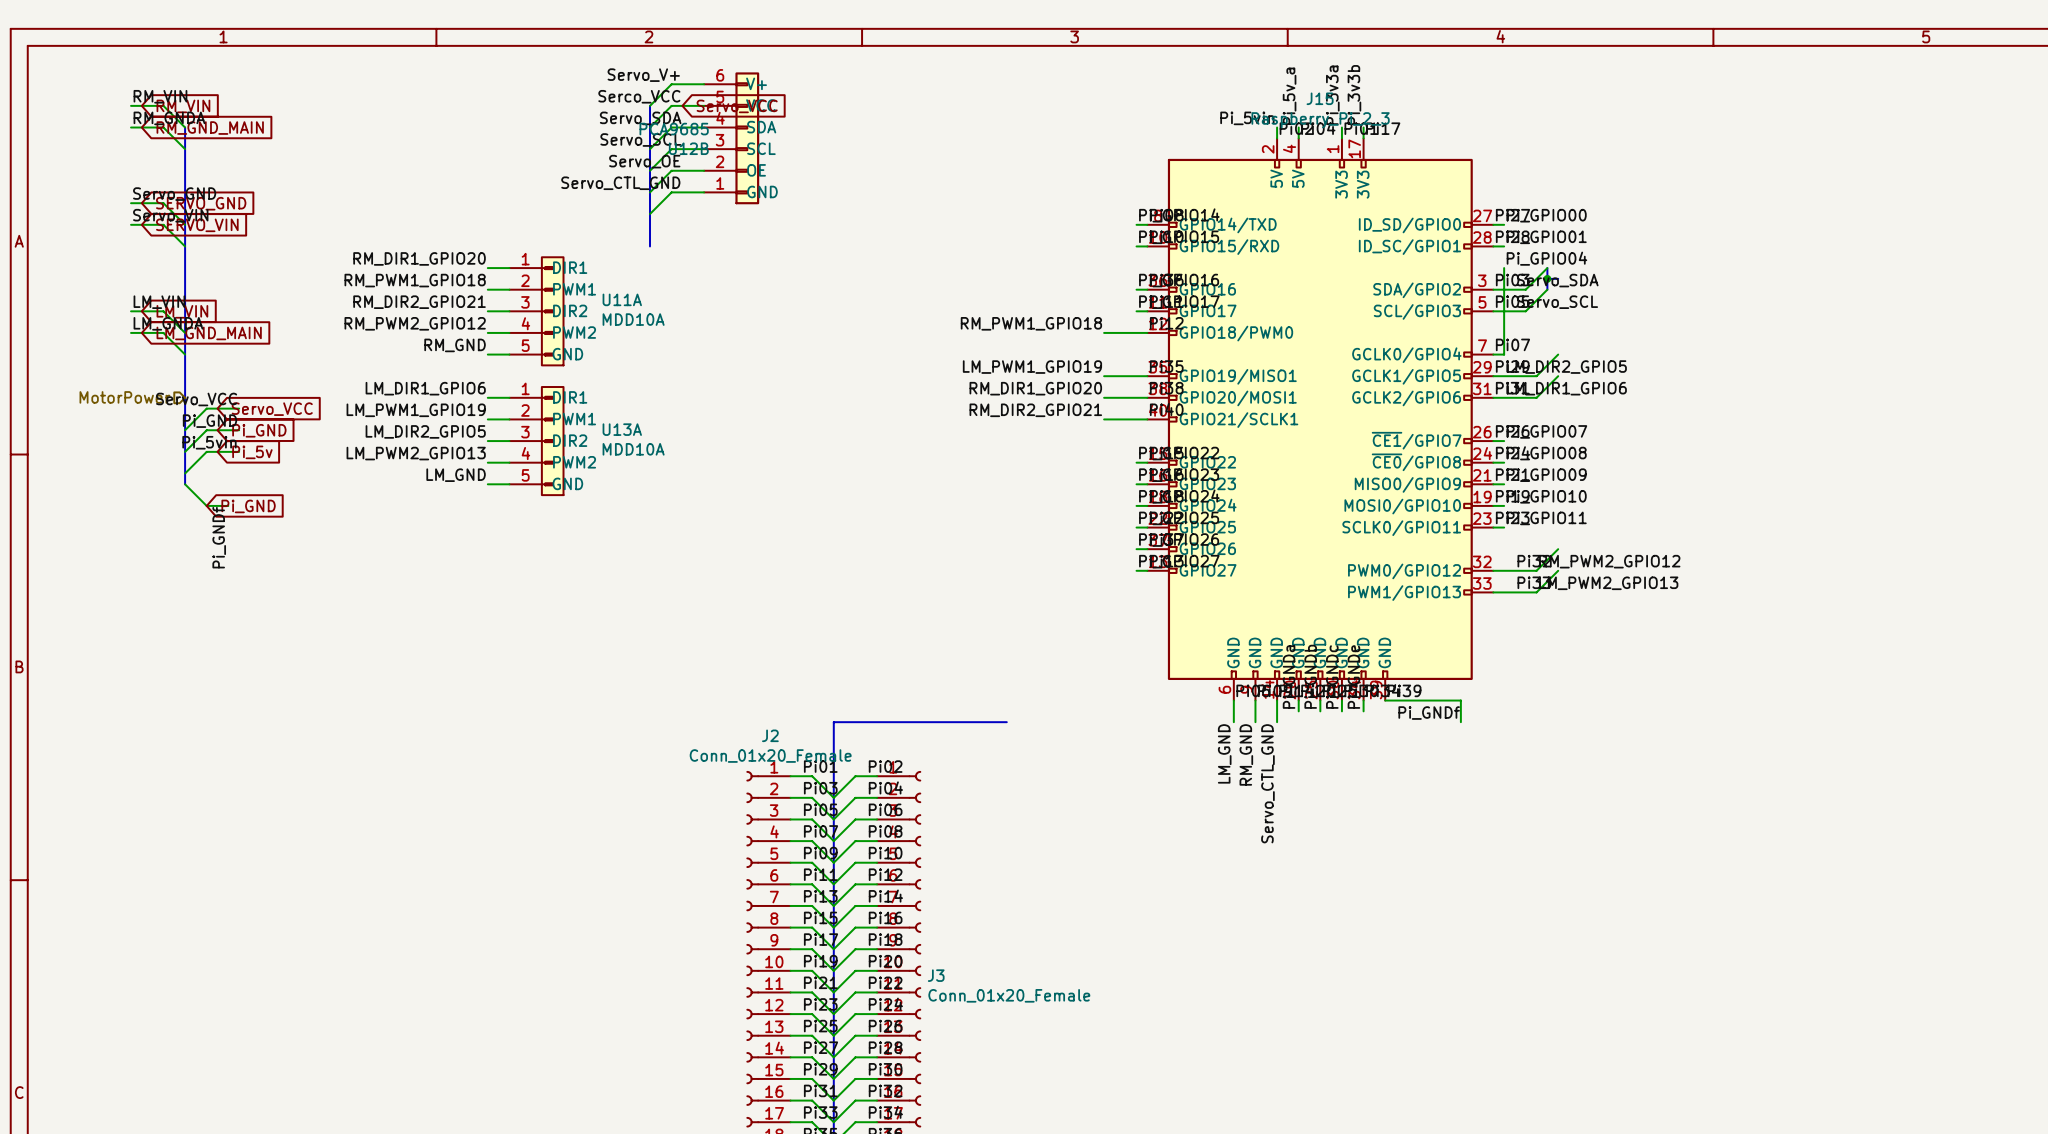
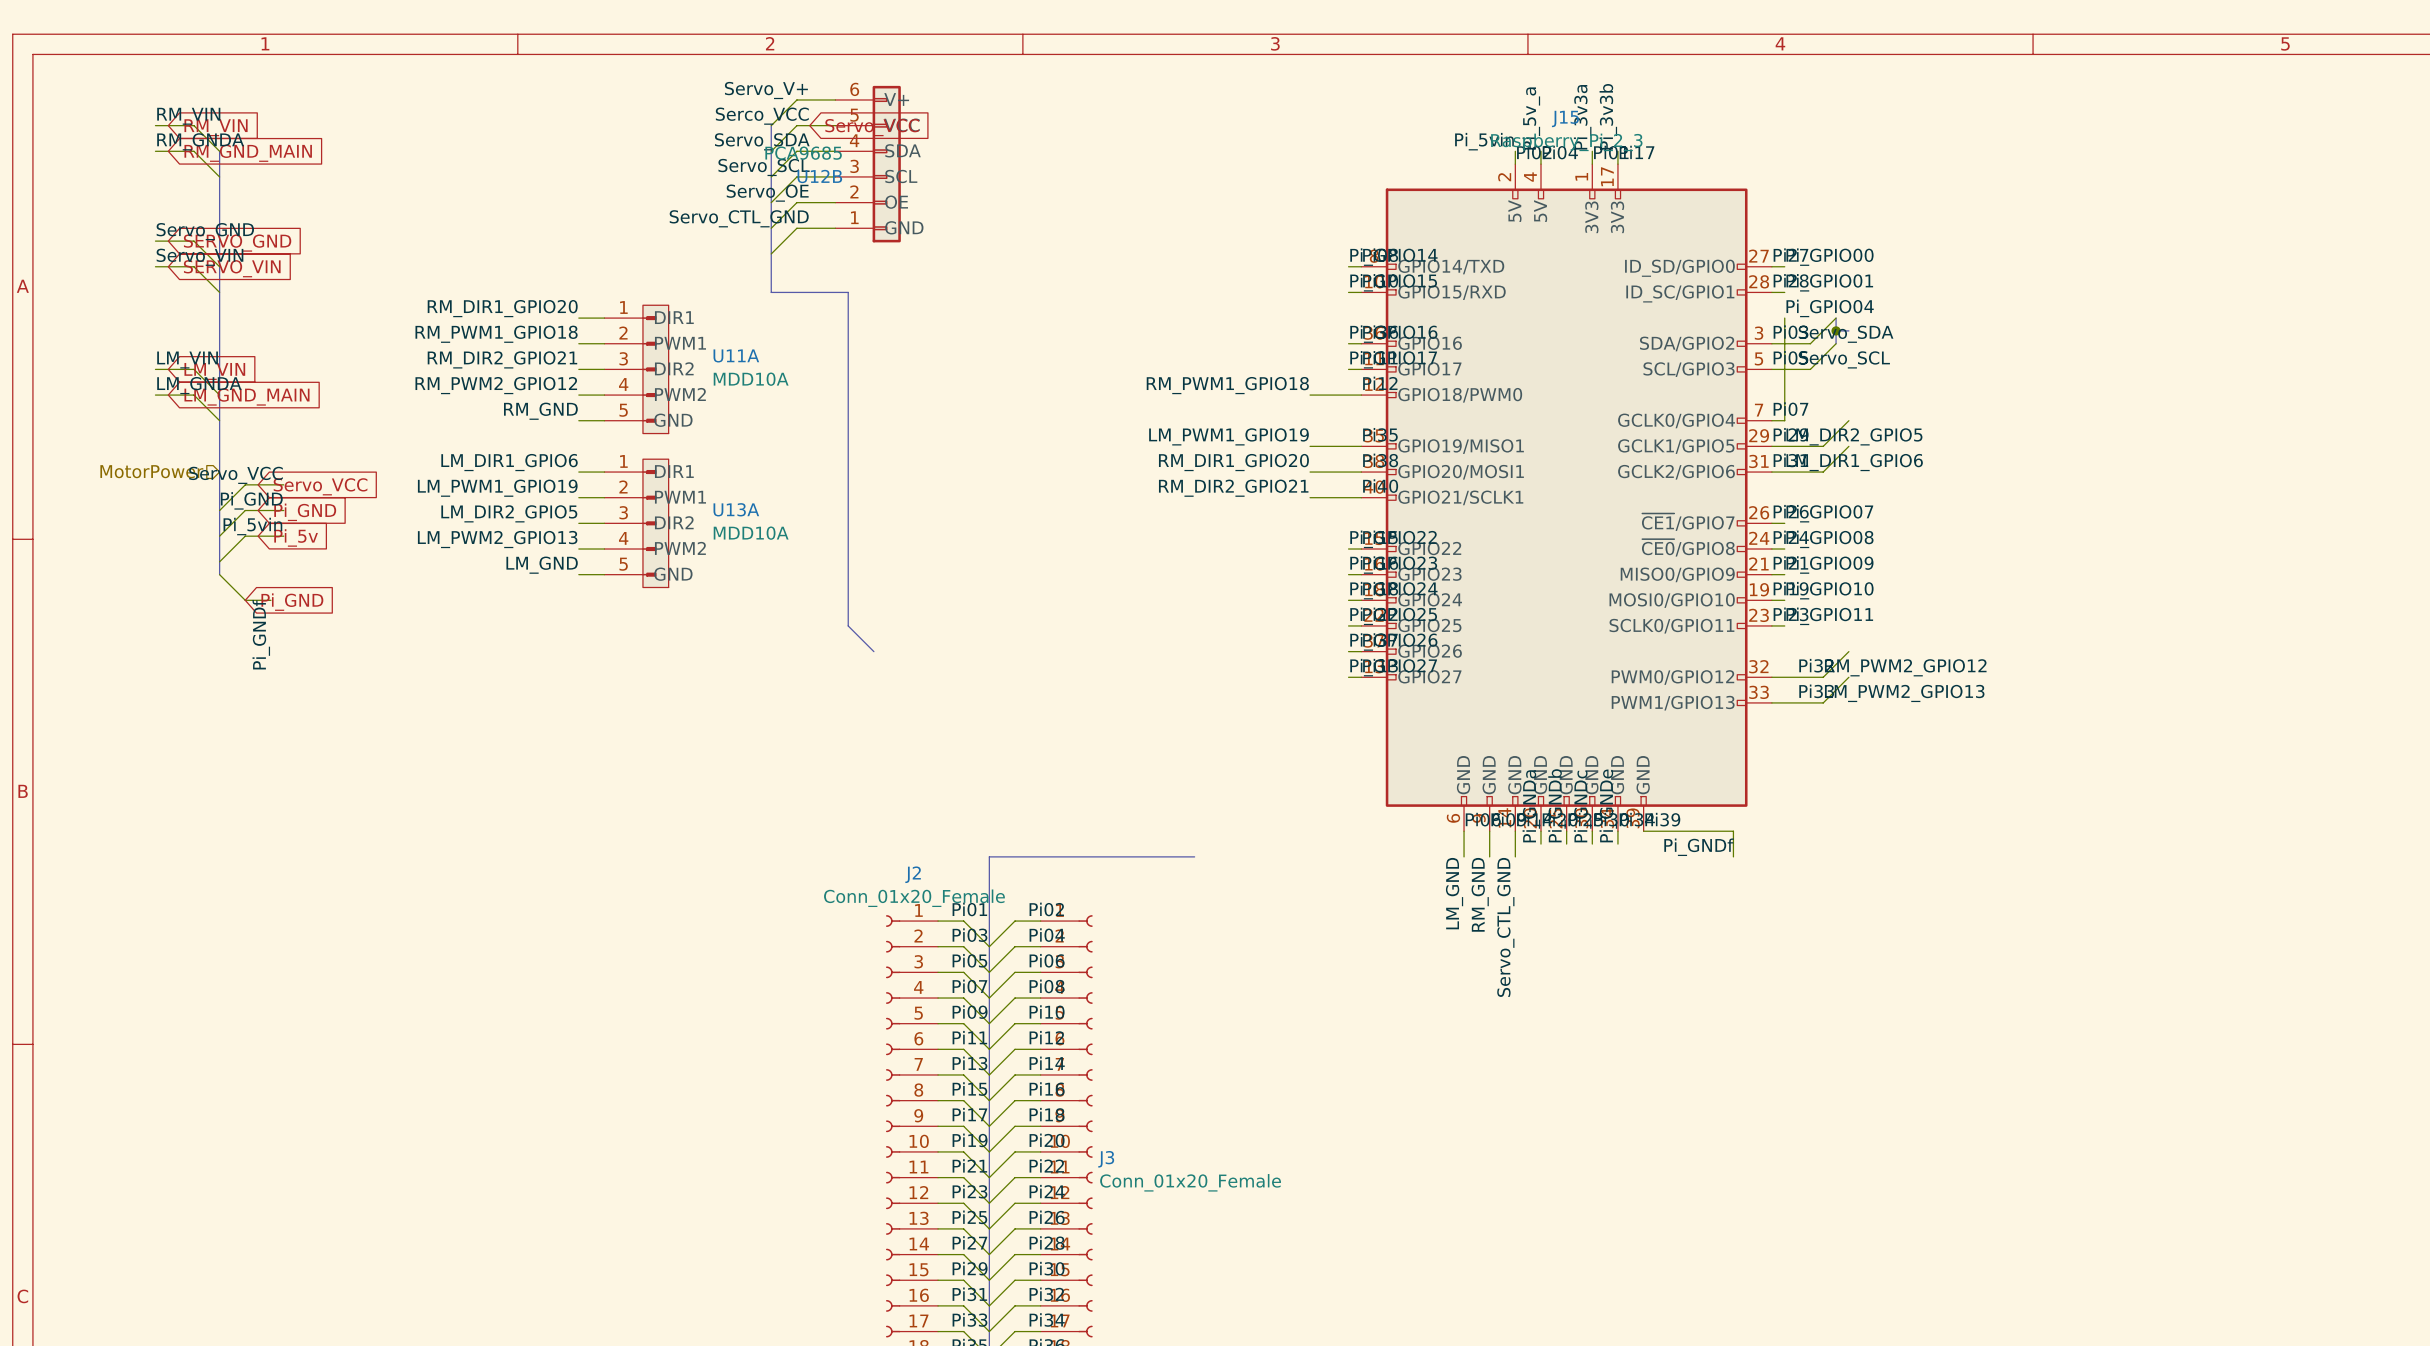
bus: none -> (771, 292) (848, 292) (848, 625) (873, 651)

